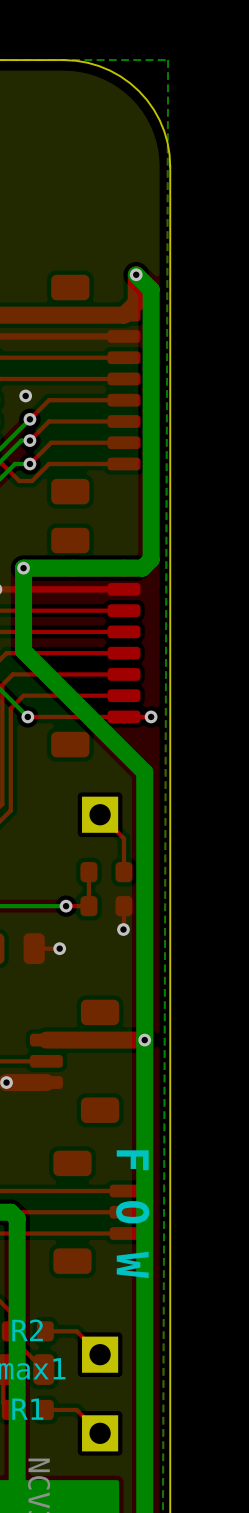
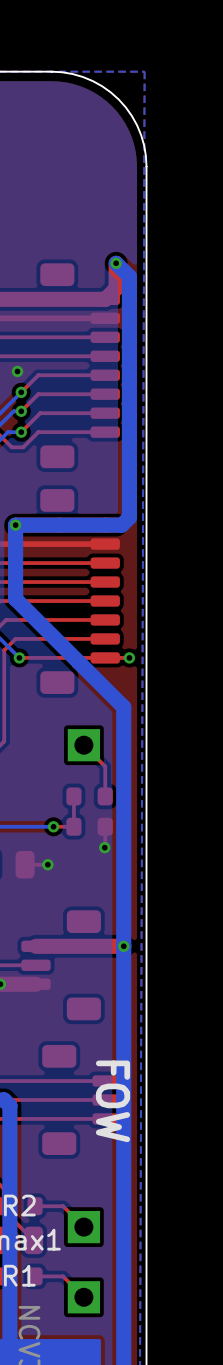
text: F O W (132, 1214) -> FOW (112, 1101)

